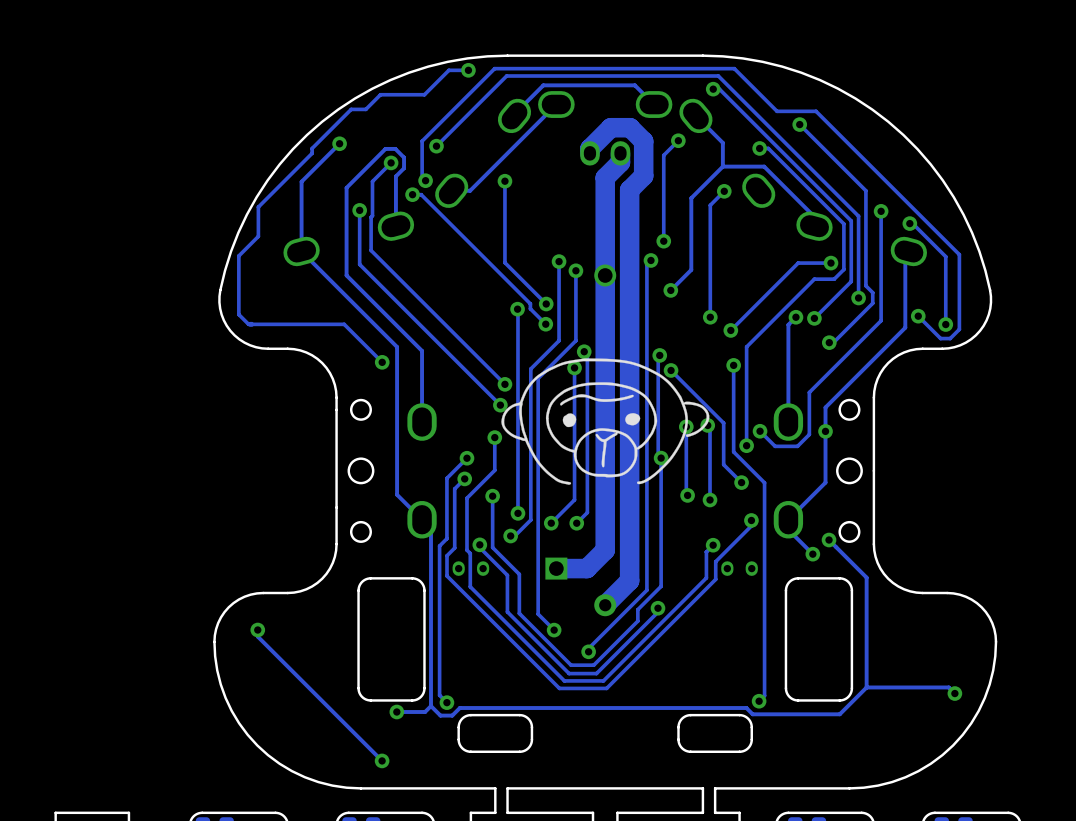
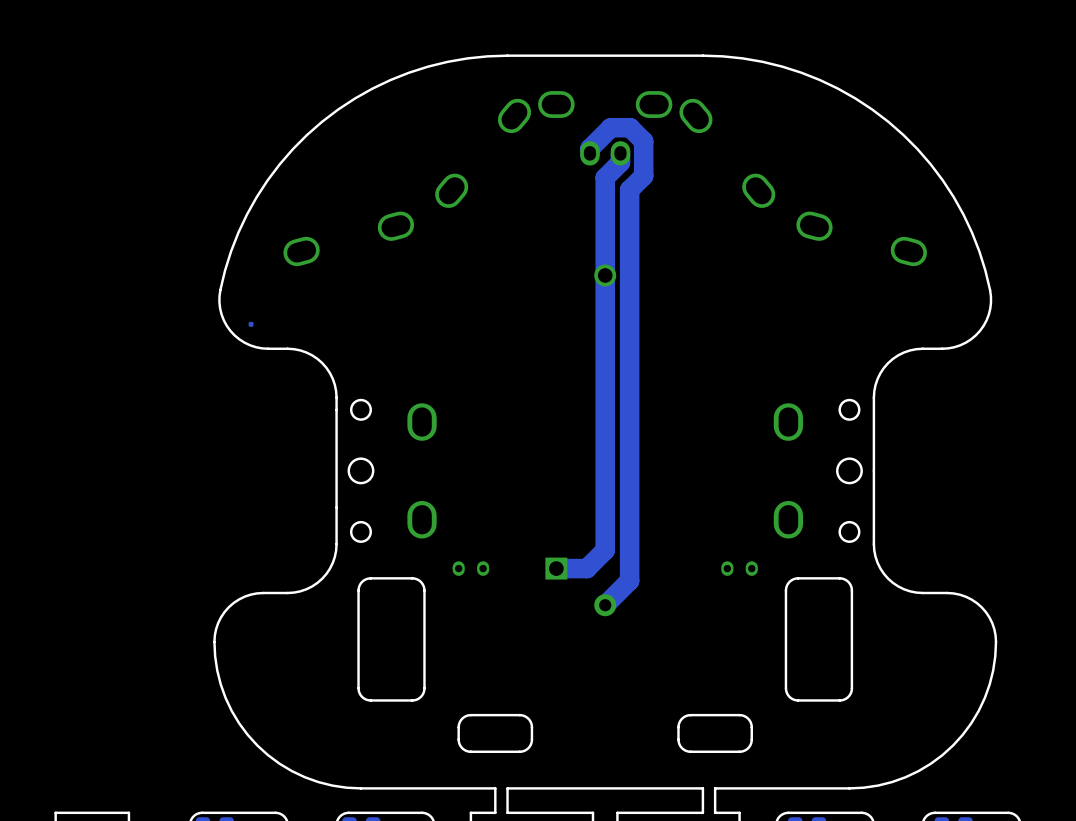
track: (468, 70) (448, 70) (424, 94) (380, 94) (365, 109) (351, 109) (312, 148) (312, 153) (258, 207) (258, 236) (238, 255) (238, 314) (248, 324) (344, 324) (382, 362) -> none
via: (468, 70) -> none
track: (713, 89) (719, 89) (851, 220) (851, 281) (814, 318) -> none
via: (713, 89) -> none
track: (556, 104) (470, 190) (451, 190) -> none
track: (654, 104) (634, 85) (543, 85) (514, 115) -> none
track: (695, 115) (722, 142) (722, 166) -> none
track: (799, 124) (865, 190) (865, 285) (872, 292) (872, 303) (833, 342) (829, 342) -> none
via: (799, 124) -> none
track: (678, 140) (663, 155) (663, 241) -> none
via: (678, 140) -> none
track: (339, 143) (301, 181) (301, 251) (397, 346) (397, 494) (430, 528) (430, 706) -> none
via: (339, 143) -> none
track: (436, 146) (506, 75) (718, 75) (858, 216) (858, 298) -> none
via: (436, 146) -> none
track: (759, 148) (768, 148) (843, 223) (843, 269) (834, 279) (814, 279) (746, 346) (746, 445) -> none
via: (759, 148) -> none
track: (391, 162) (372, 181) (371, 250) (504, 384) -> none
via: (391, 162) -> none
track: (722, 166) (691, 198) (691, 269) (670, 290) -> none
track: (722, 166) (764, 166) (814, 216) (814, 226) -> none
track: (425, 180) (422, 177) (422, 141) (494, 68) (734, 68) (777, 111) (816, 111) (959, 254) (959, 329) (950, 338) (940, 338) (918, 316) -> none
via: (425, 180) -> none
track: (504, 181) (504, 262) (546, 304) -> none
via: (504, 181) -> none
track: (724, 191) (710, 205) (710, 317) -> none
via: (724, 191) -> none
track: (412, 194) (421, 194) (530, 303) (530, 308) (545, 324) -> none
via: (412, 194) -> none
track: (359, 210) (359, 264) (500, 405) -> none
via: (359, 210) -> none
track: (881, 211) (881, 320) (809, 392) (809, 434) (797, 446) (775, 446) (760, 431) -> none
via: (881, 211) -> none
track: (909, 223) (912, 223) (945, 256) (945, 324) -> none
via: (909, 223) -> none
track: (395, 226) (395, 176) (404, 168) (404, 157) (395, 148) (385, 148) (346, 187) (346, 275) (422, 350) (422, 422) -> none
via: (663, 241) -> none
track: (908, 251) (905, 255) (905, 327) (825, 407) (825, 482) (788, 519) (788, 529) (812, 554) -> none
track: (650, 260) (646, 264) (646, 590) (588, 648) (588, 651) -> none
via: (650, 260) -> none
track: (559, 261) (559, 340) (530, 368) (530, 520) (514, 536) (510, 536) -> none
via: (559, 261) -> none
track: (830, 263) (798, 263) (730, 330) -> none
via: (830, 263) -> none
track: (575, 270) (575, 340) (538, 378) (538, 614) (554, 630) -> none
via: (575, 270) -> none
via: (670, 290) -> none
via: (858, 298) -> none
via: (546, 304) -> none
track: (517, 309) (517, 513) -> none
via: (517, 309) -> none
via: (918, 316) -> none
via: (710, 317) -> none
track: (795, 317) (788, 324) (788, 422) -> none
via: (795, 317) -> none
via: (814, 318) -> none
via: (545, 324) -> none
via: (945, 324) -> none
via: (730, 330) -> none
via: (829, 342) -> none
track: (584, 351) (587, 354) (587, 512) (576, 523) -> none
via: (584, 351) -> none
track: (659, 355) (658, 356) (658, 455) (661, 458) (661, 586) (637, 609) (637, 621) (593, 665) (571, 665) (519, 613) (519, 574) (492, 547) (492, 496) -> none
via: (659, 355) -> none
drawing: [501, 358, 710, 485] -> none
via: (382, 362) -> none
track: (733, 365) (733, 451) (764, 482) (764, 695) (759, 701) -> none
via: (733, 365) -> none
track: (574, 367) (574, 499) (551, 523) -> none
via: (574, 367) -> none
track: (671, 370) (723, 423) (723, 464) (741, 482) -> none
via: (671, 370) -> none
via: (504, 384) -> none
via: (500, 405) -> none
track: (707, 425) (710, 427) (710, 500) -> none
via: (707, 425) -> none
track: (686, 426) (687, 495) -> none
via: (686, 426) -> none
via: (760, 431) -> none
via: (825, 431) -> none
track: (494, 437) (494, 470) (466, 498) (466, 550) (470, 553) (470, 586) (564, 680) (603, 680) (706, 577) (706, 551) (713, 545) -> none
via: (494, 437) -> none
via: (746, 445) -> none
track: (466, 458) (446, 478) (446, 538) (439, 546) (439, 695) (446, 702) -> none
via: (466, 458) -> none
via: (661, 458) -> none
track: (464, 478) (454, 488) (454, 548) (447, 555) (447, 575) (559, 688) (606, 688) (715, 579) (715, 561) (751, 525) (751, 520) -> none
via: (464, 478) -> none
via: (741, 482) -> none
via: (687, 495) -> none
via: (492, 496) -> none
via: (710, 500) -> none
via: (517, 513) -> none
via: (751, 520) -> none
via: (551, 523) -> none
via: (576, 523) -> none
via: (510, 536) -> none
track: (829, 540) (866, 577) (866, 687) -> none
via: (829, 540) -> none
track: (479, 544) (479, 547) (507, 575) (507, 611) (569, 673) (596, 673) (657, 612) (657, 608) -> none
via: (479, 544) -> none
via: (713, 545) -> none
via: (812, 554) -> none
via: (657, 608) -> none
track: (257, 630) (257, 636) (382, 760) -> none
via: (257, 630) -> none
via: (554, 630) -> none
via: (588, 651) -> none
track: (866, 687) (948, 687) (954, 693) -> none
track: (866, 687) (839, 714) (752, 714) (746, 708) (459, 708) (452, 715) (440, 715) (430, 706) -> none
via: (954, 693) -> none
via: (759, 701) -> none
via: (446, 702) -> none
track: (430, 706) (425, 712) (396, 712) -> none
via: (396, 712) -> none
via: (382, 760) -> none

